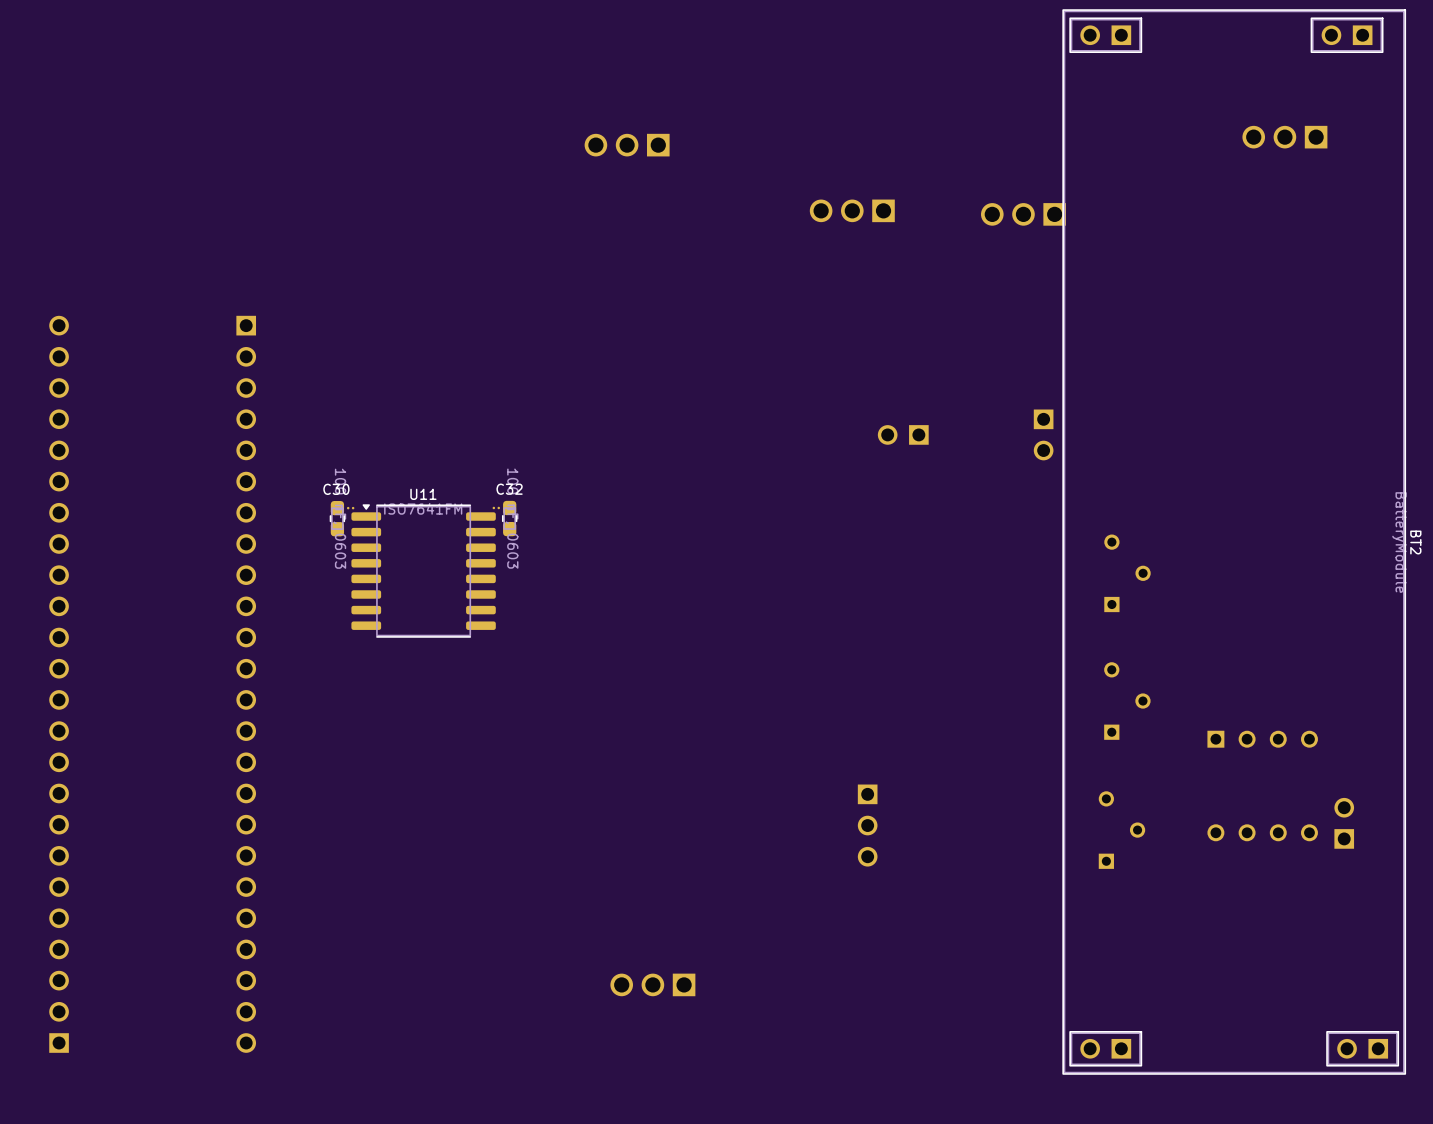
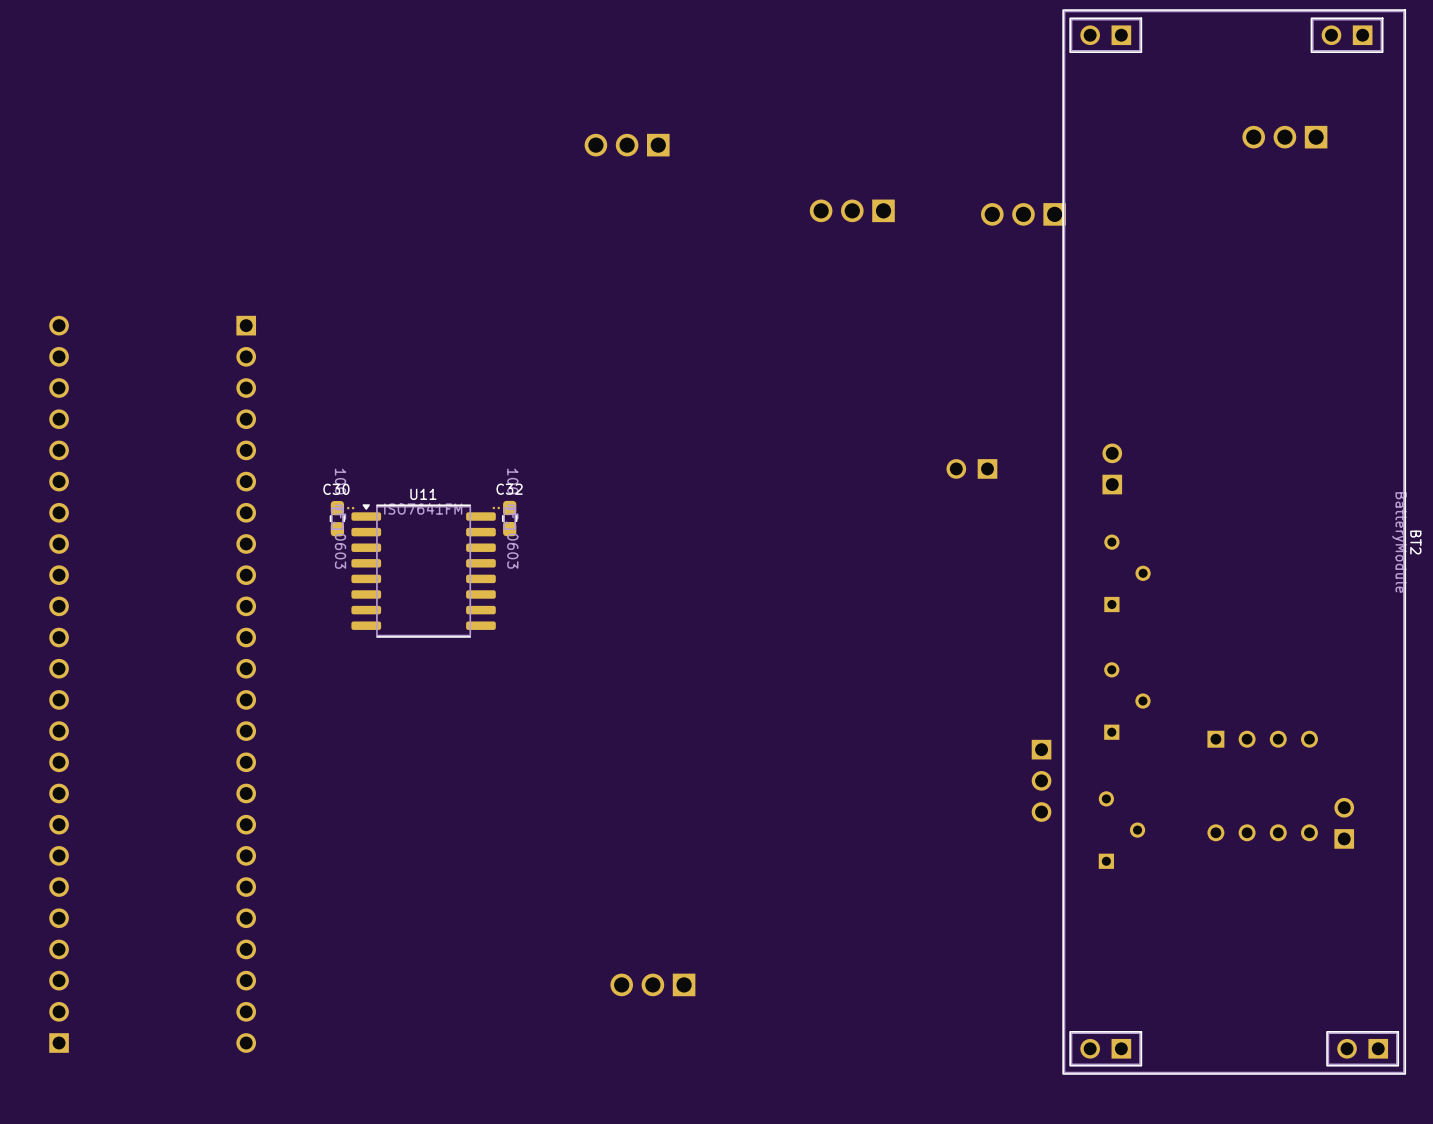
part: (903, 434) -> none
part: (1043, 434) -> none
part: none -> (971, 468)
part: none -> (1112, 468)
part position: (867, 825) -> (1041, 780)

